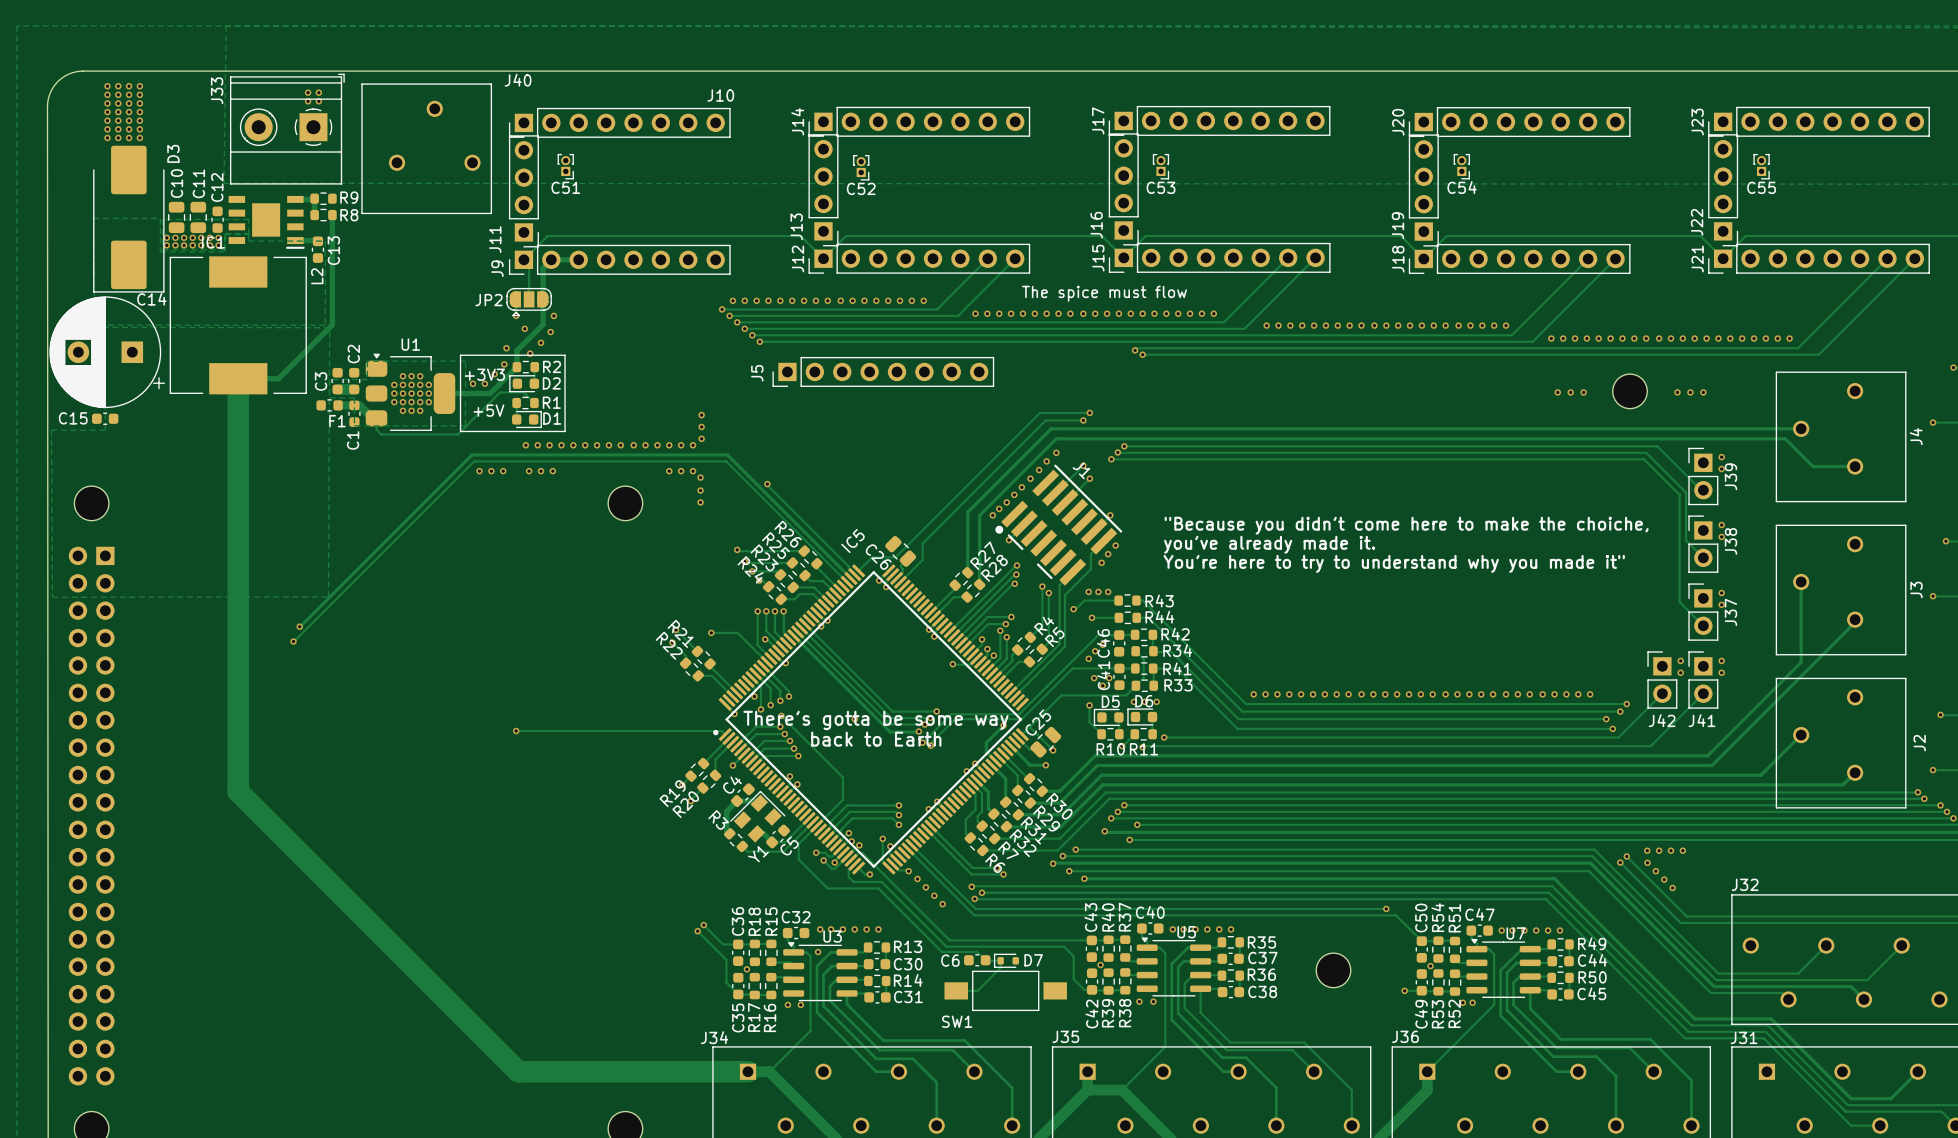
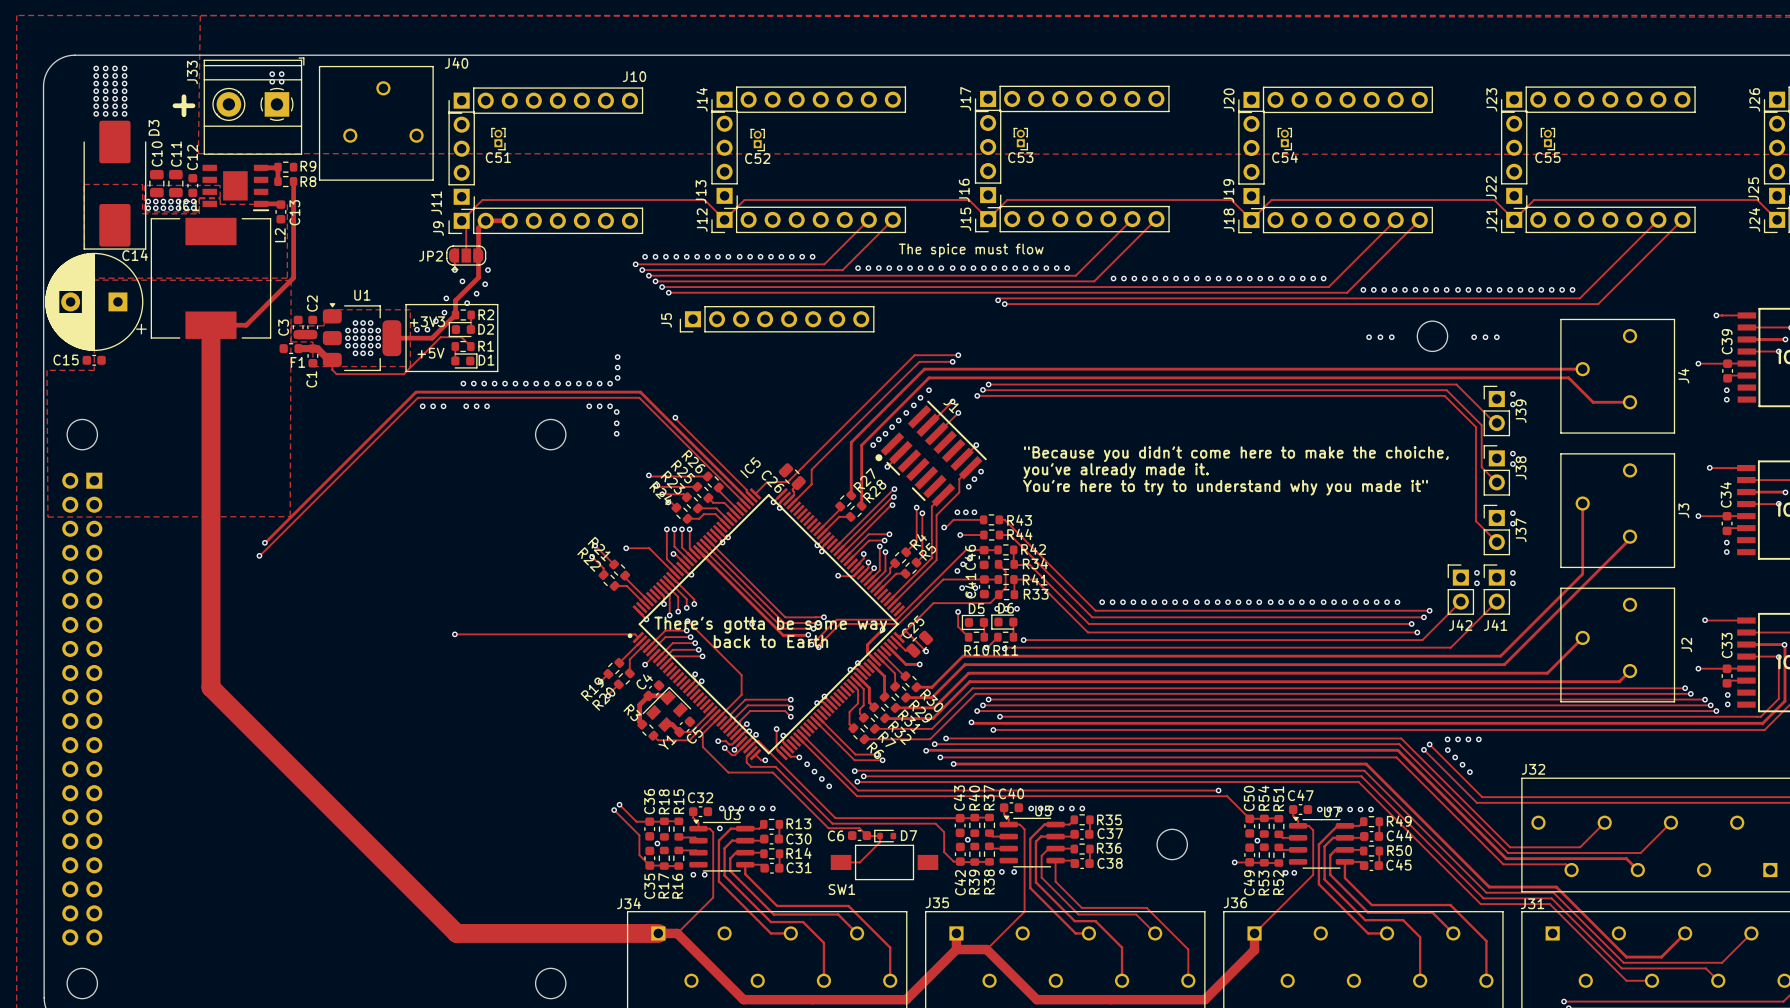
text: none -> + (183, 105)

